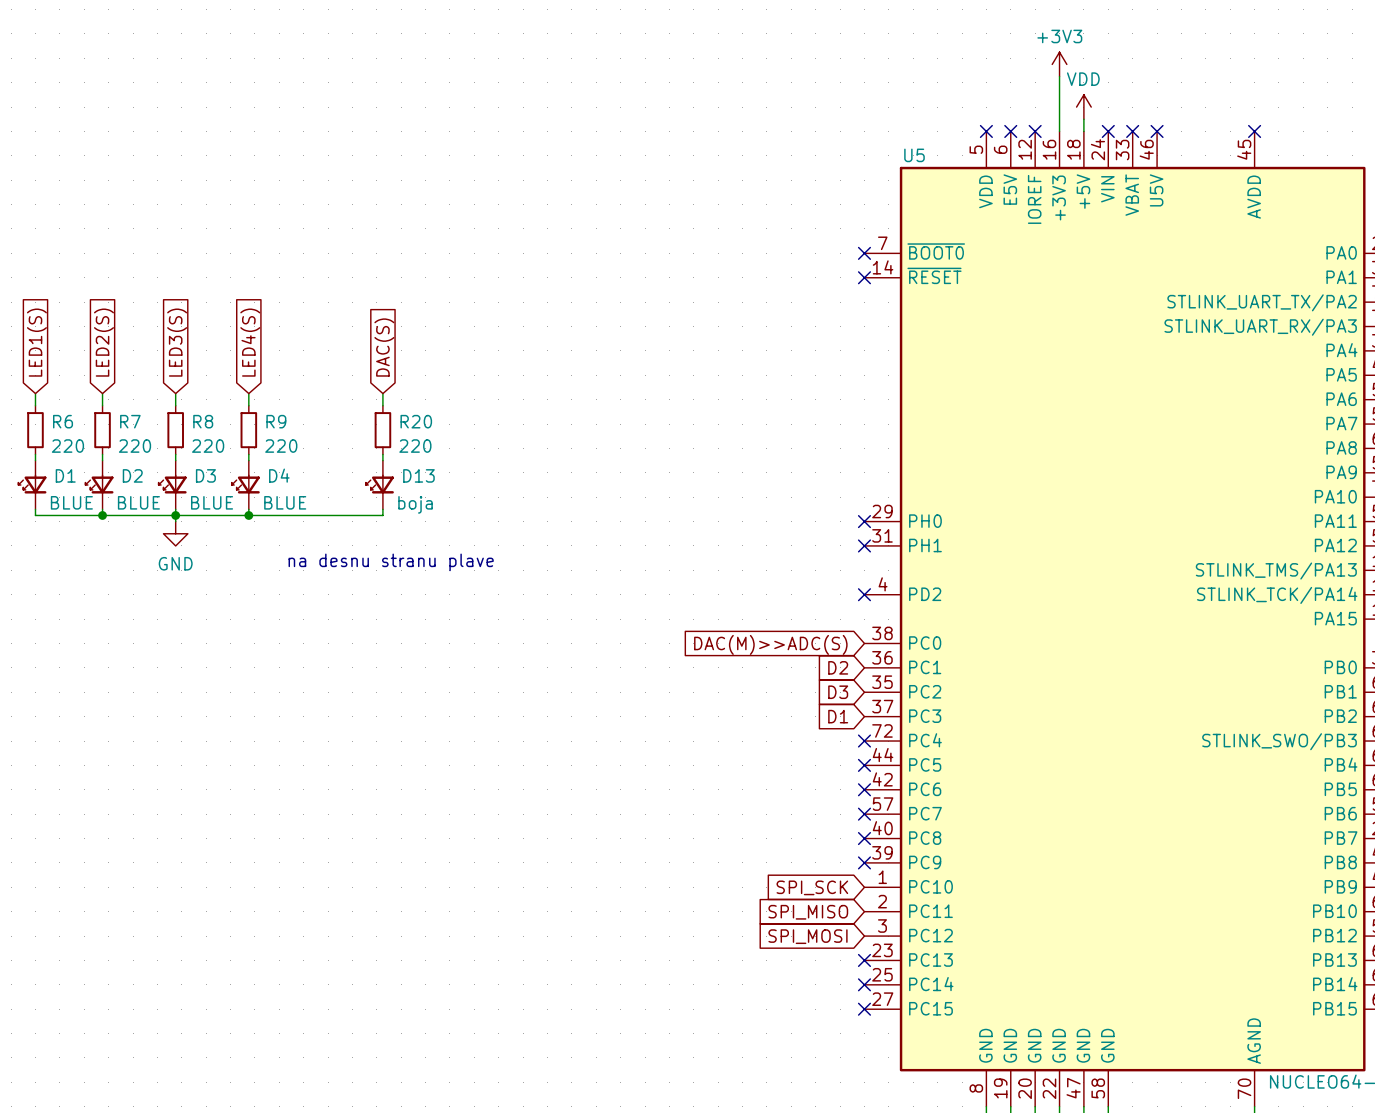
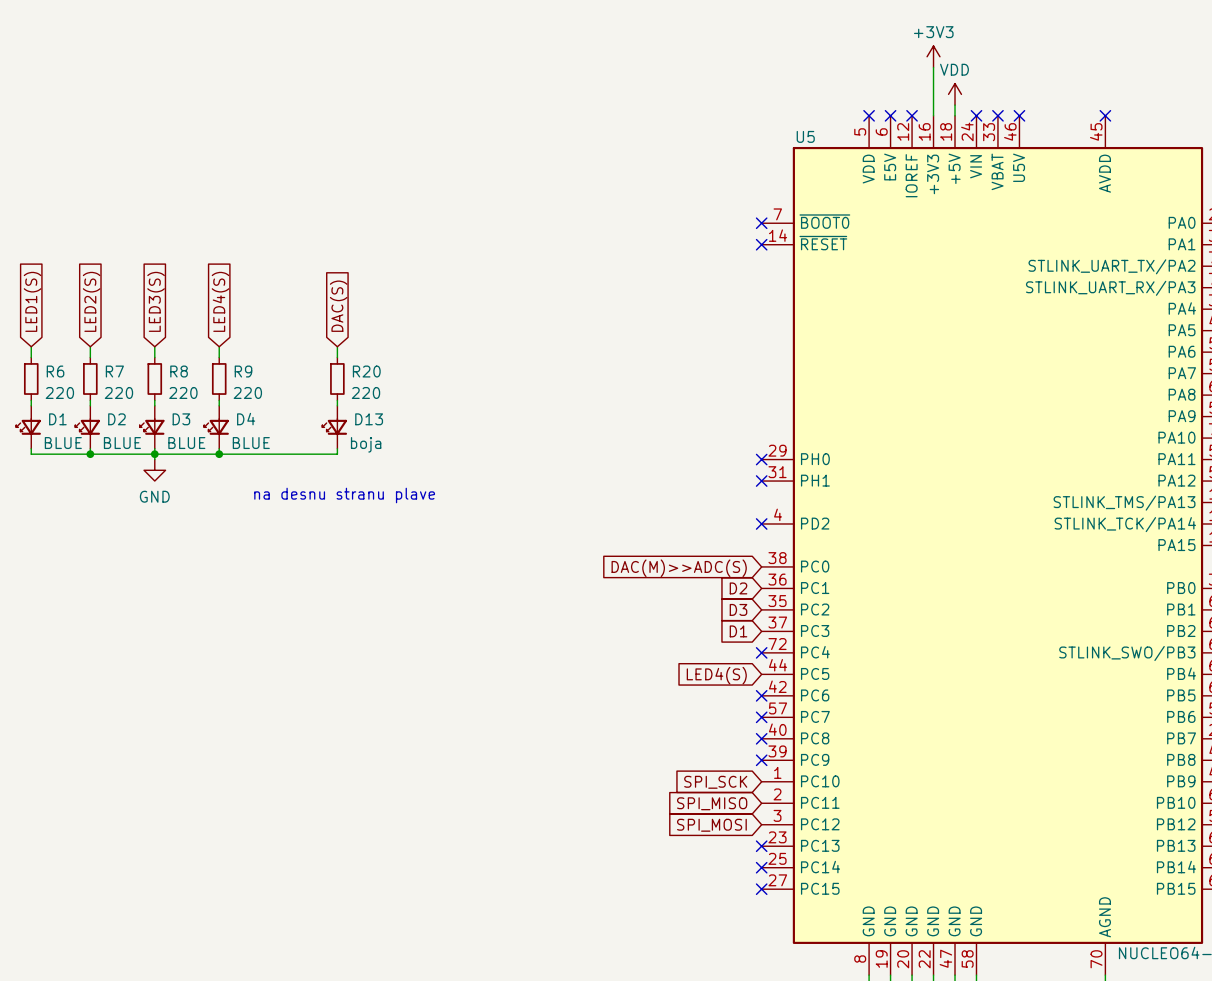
no-connect mark: (864, 765) -> none
global label: none -> LED4(S) (716, 675)

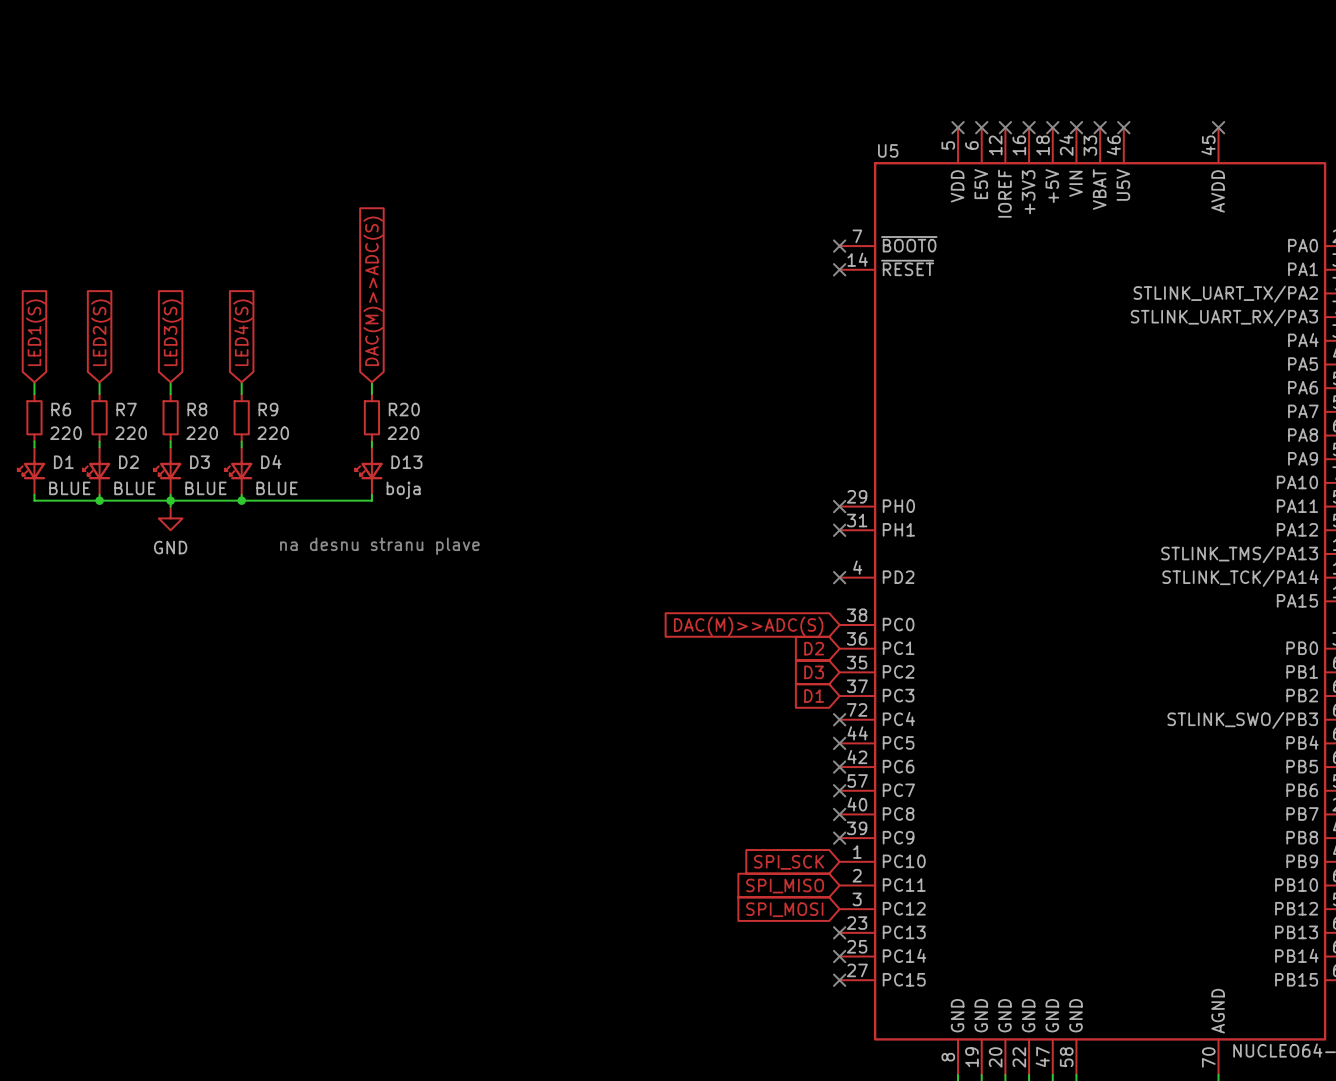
power symbol: +3V3 (933, 56) -> none
wire: (933, 67) (933, 115) -> none
power symbol: VDD (955, 94) -> none
wire: (955, 105) (955, 115) -> none
no-connect mark: none -> (1029, 127)
no-connect mark: none -> (1052, 127)
global label: DAC(S) (338, 306) -> DAC(M)>>ADC(S) (373, 291)
no-connect mark: none -> (839, 743)
global label: LED4(S) (716, 675) -> none

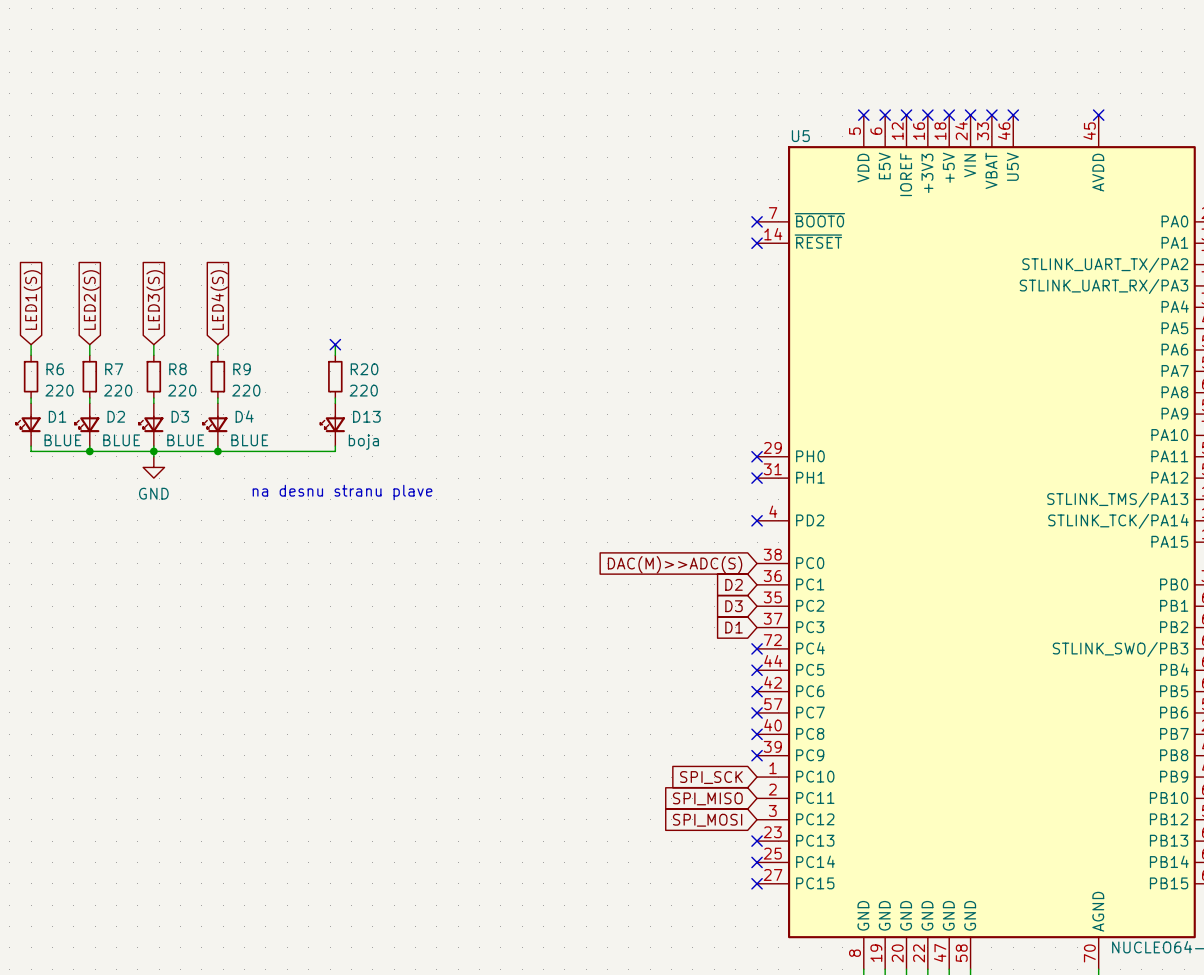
global label: DAC(M)>>ADC(S) (373, 291) -> none
no-connect mark: none -> (335, 344)

